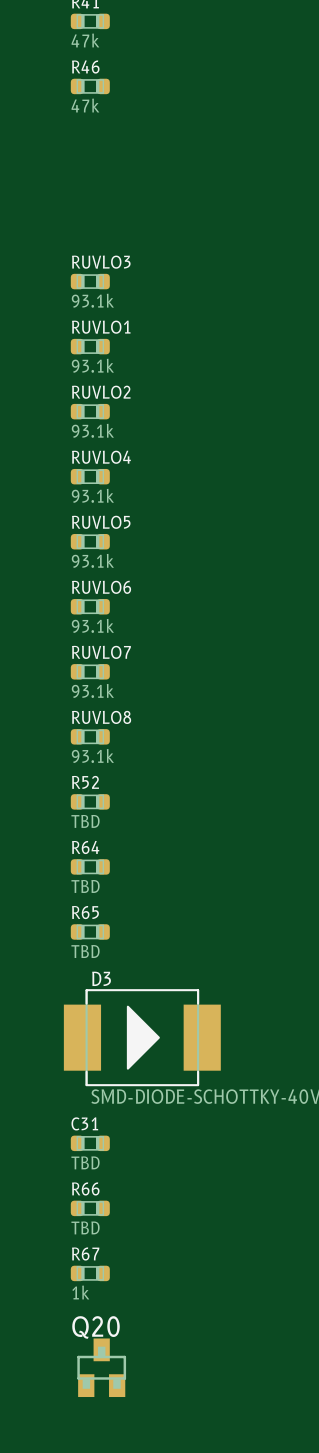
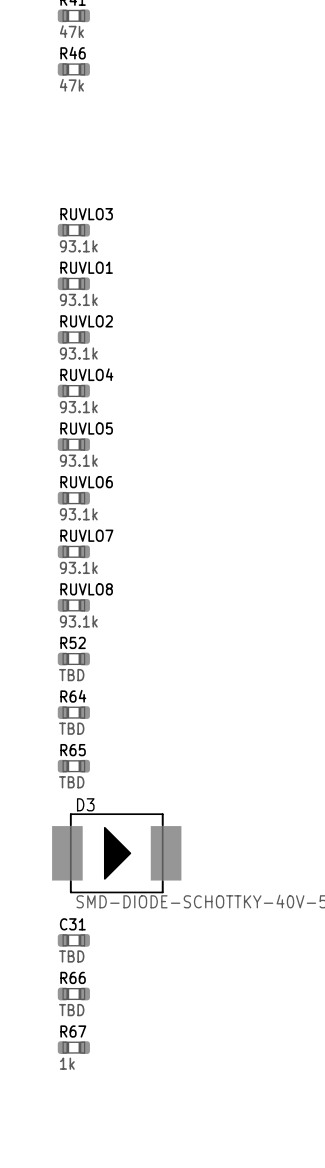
Q20: (101, 1367) -> none

